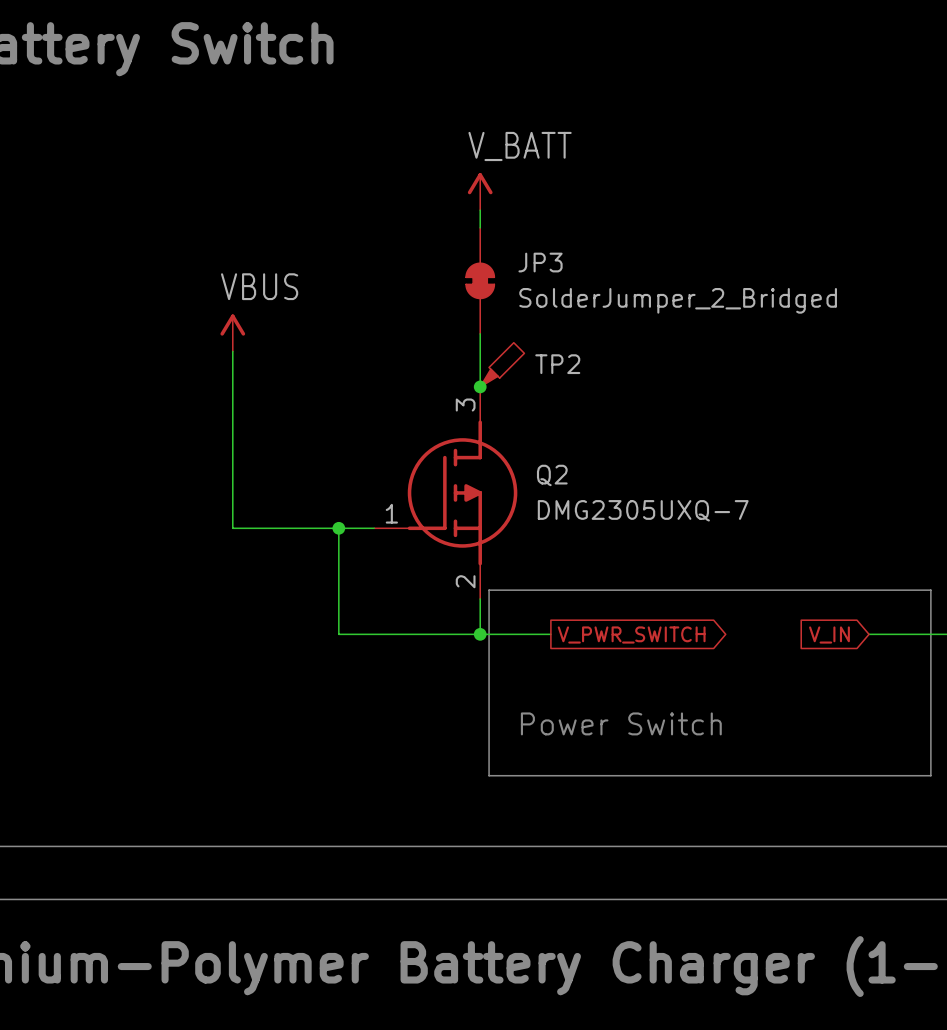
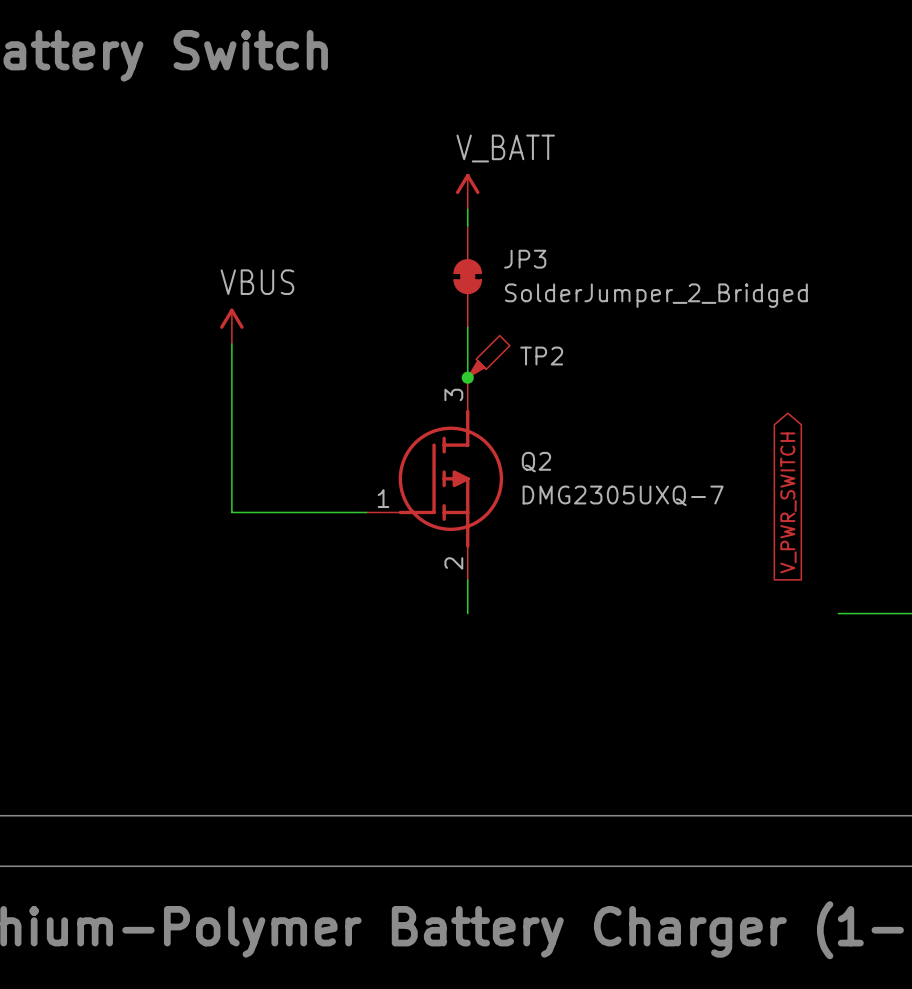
wire: (338, 528) (338, 634) (550, 634) -> none
junction: (338, 528) -> none
line: (489, 590) (930, 590) (930, 775) (489, 775) (489, 590) -> none
junction: (480, 634) -> none
global label rotation: 0° (631, 635) -> 90° counterclockwise (788, 502)
global label position: V_PWR_SWITCH (631, 635) -> V_PWR_SWITCH (788, 502)
global label: V_IN (829, 635) -> none
text: Power Switch (621, 723) -> none

